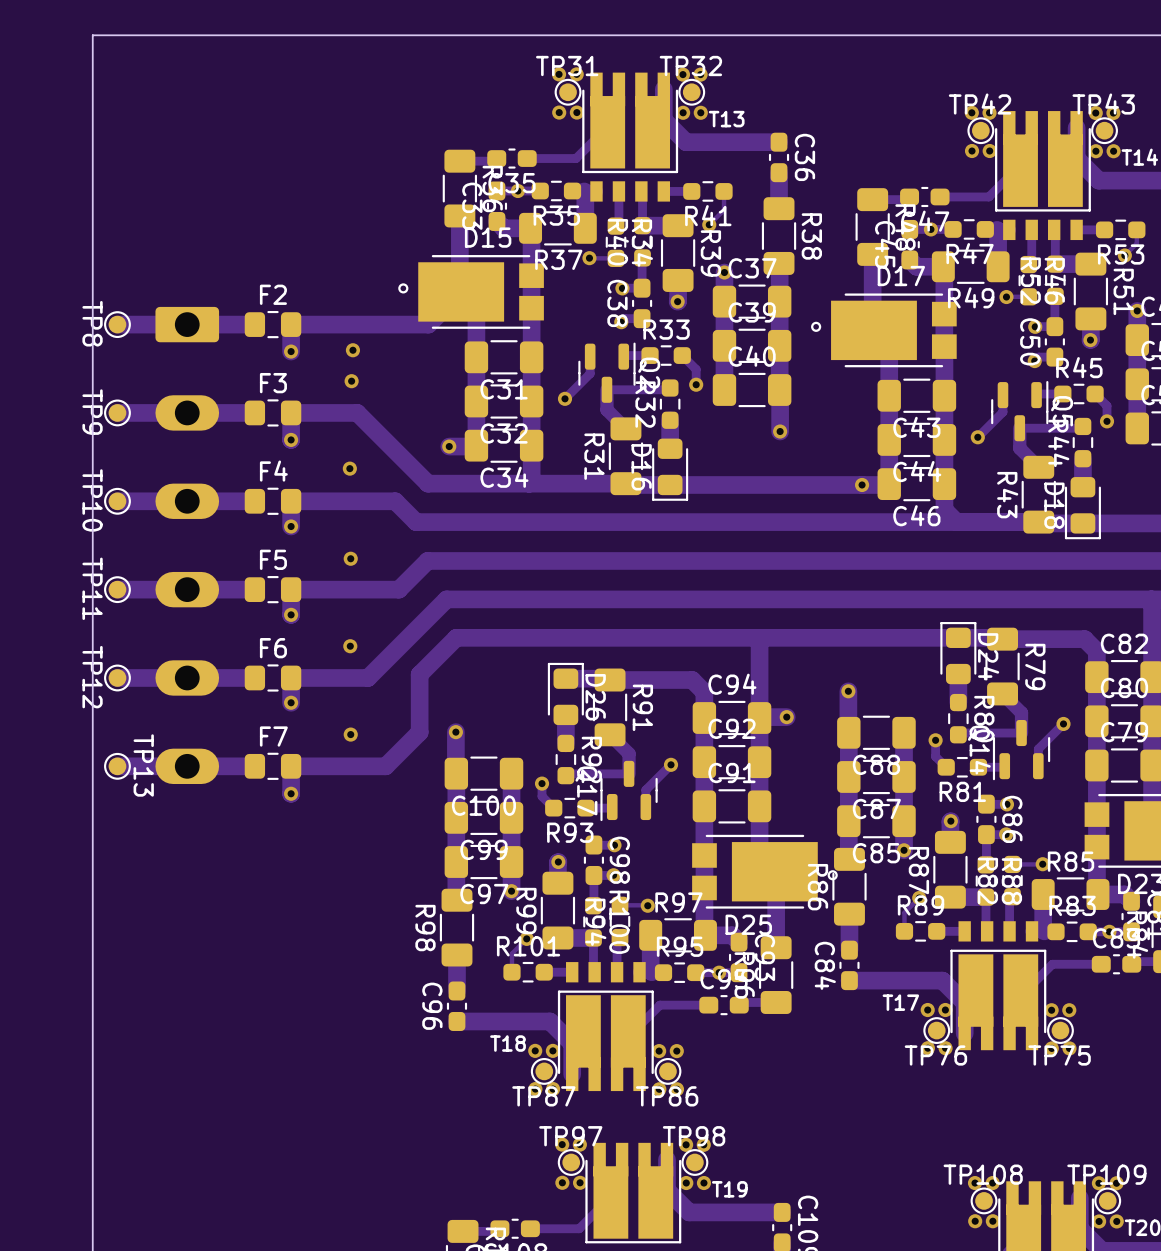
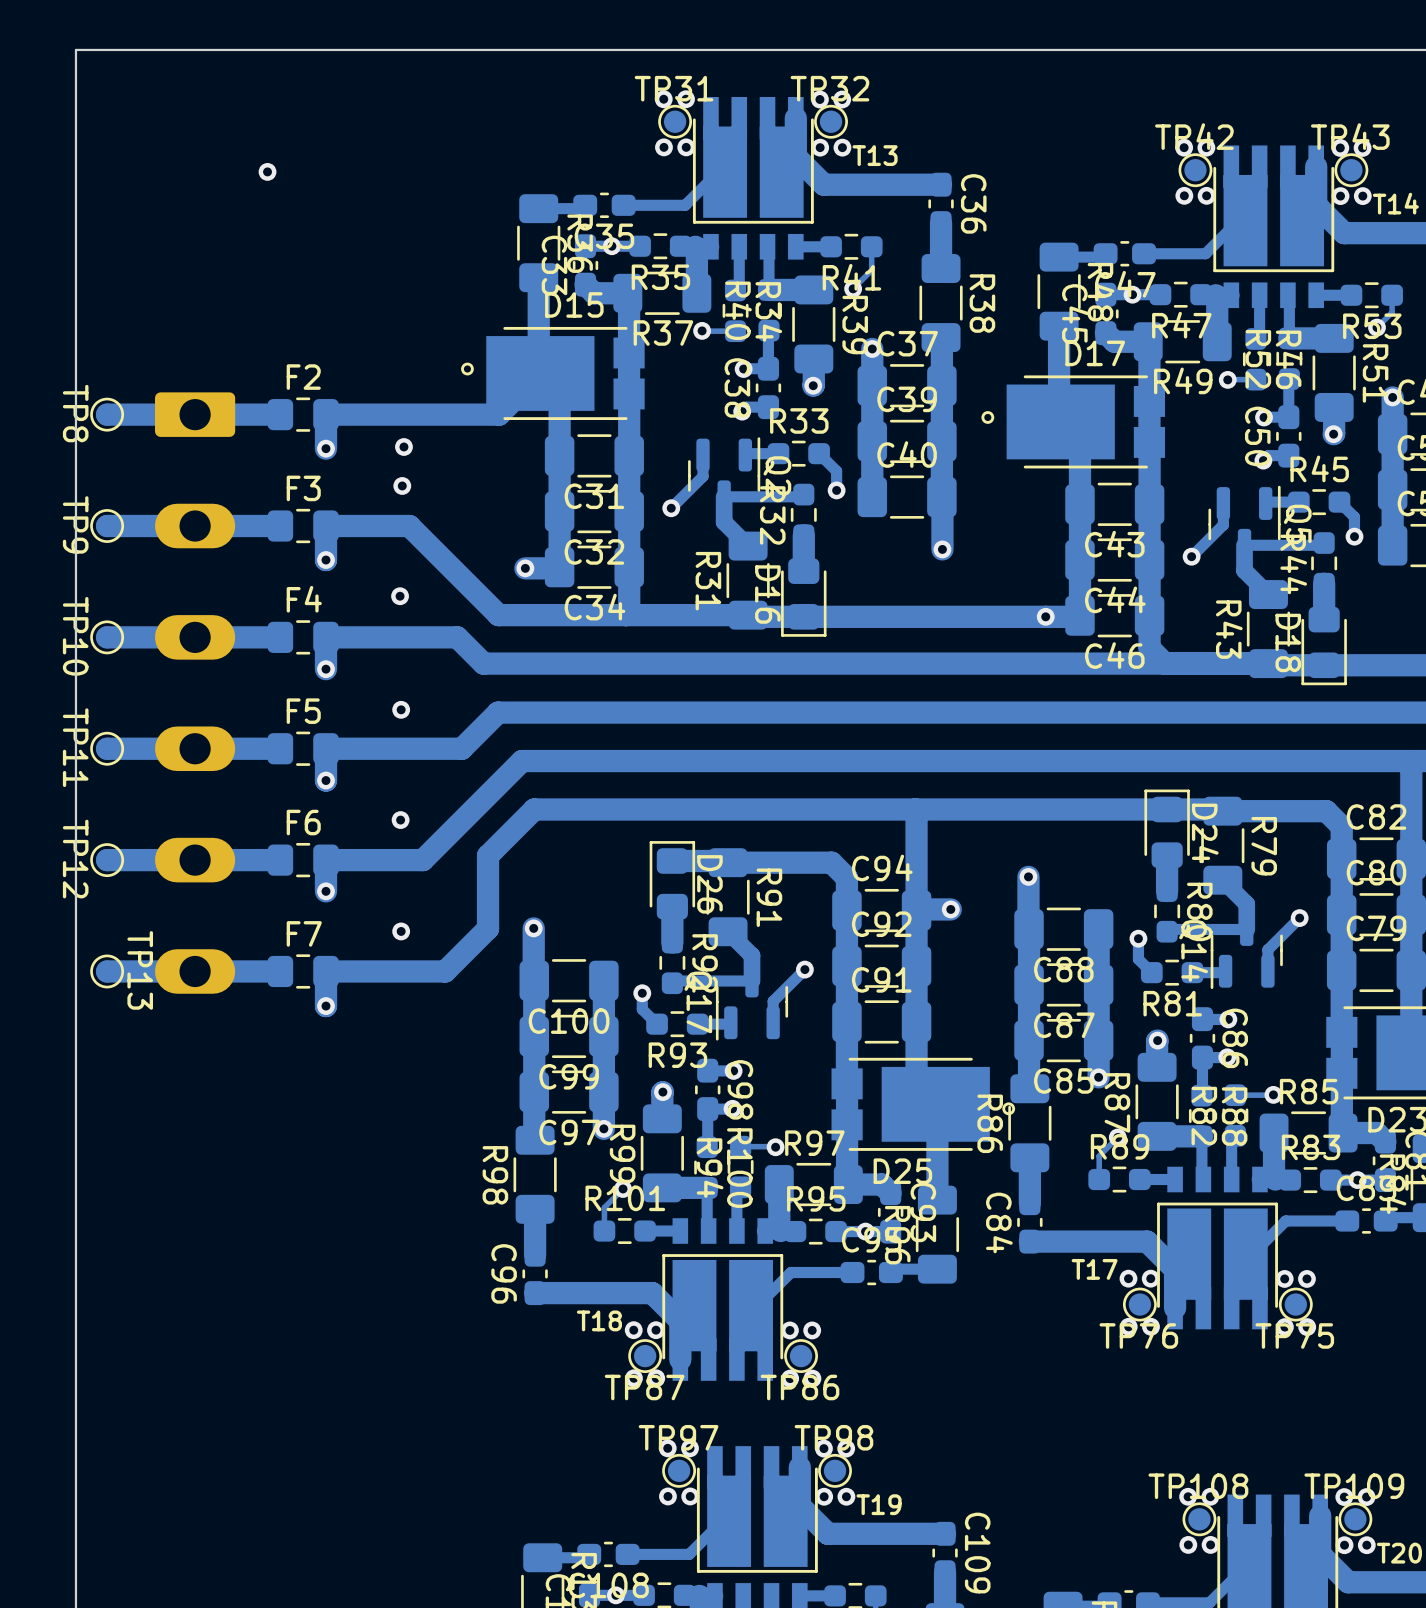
via: none -> (267, 171)

